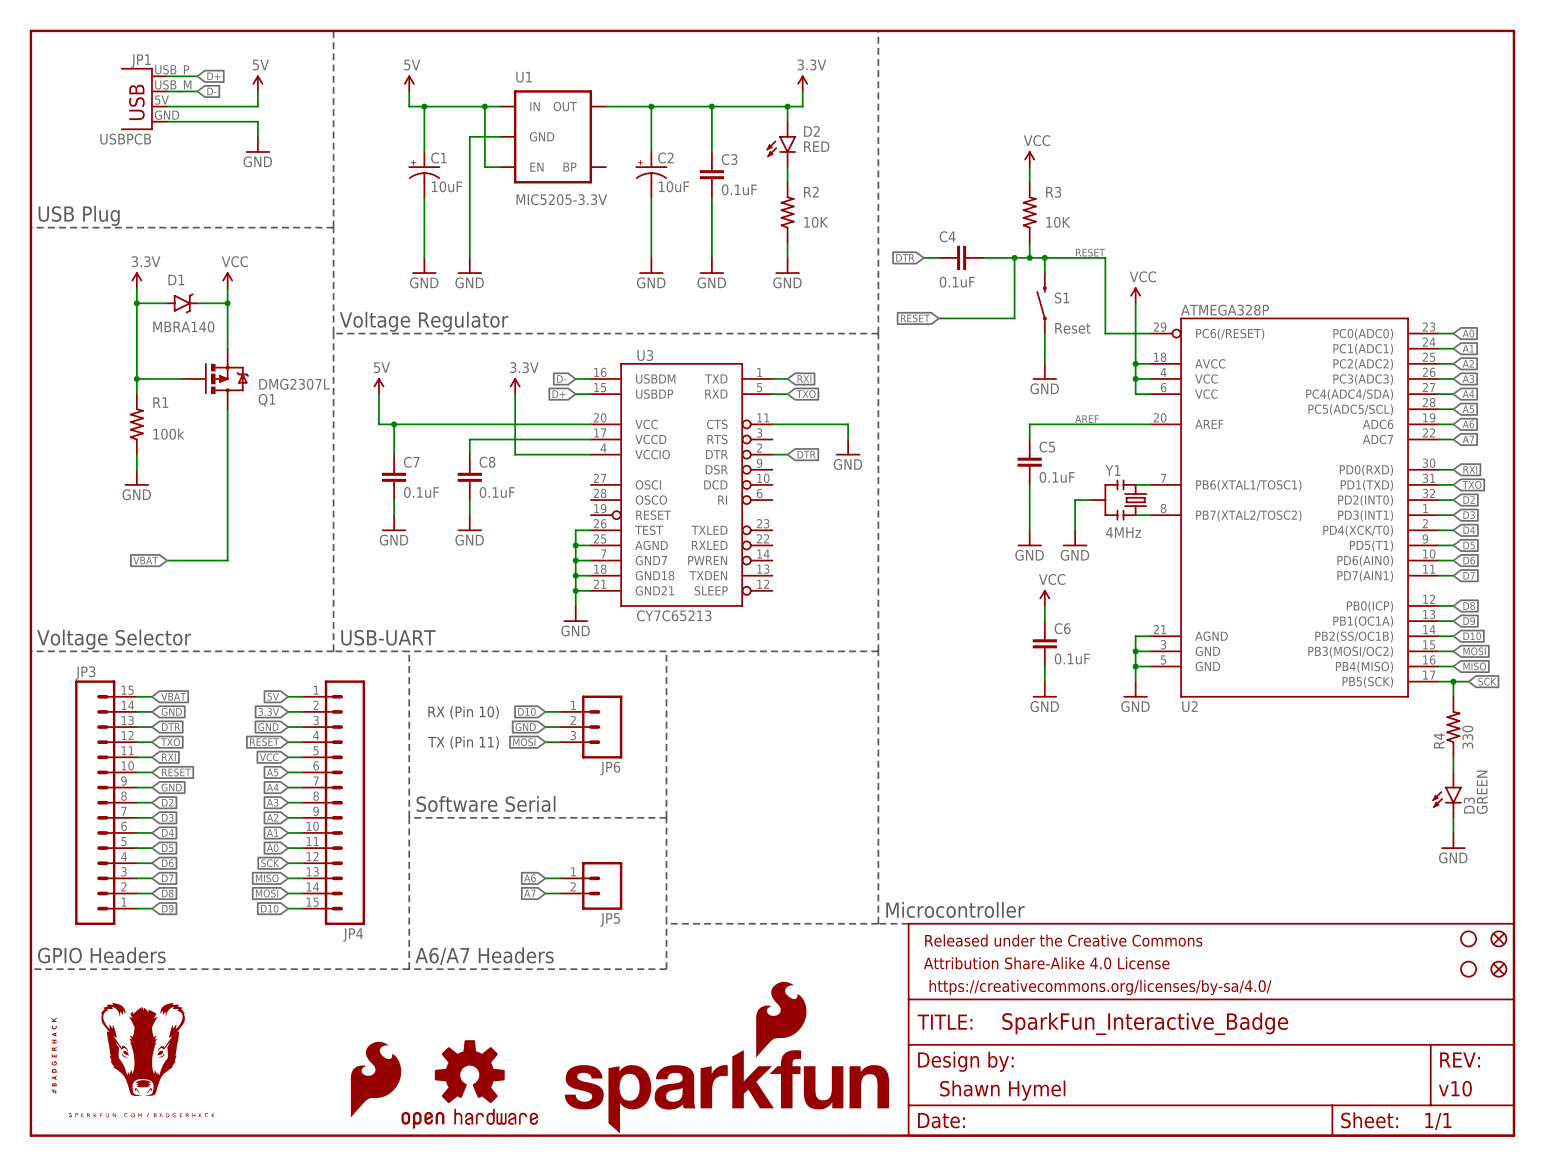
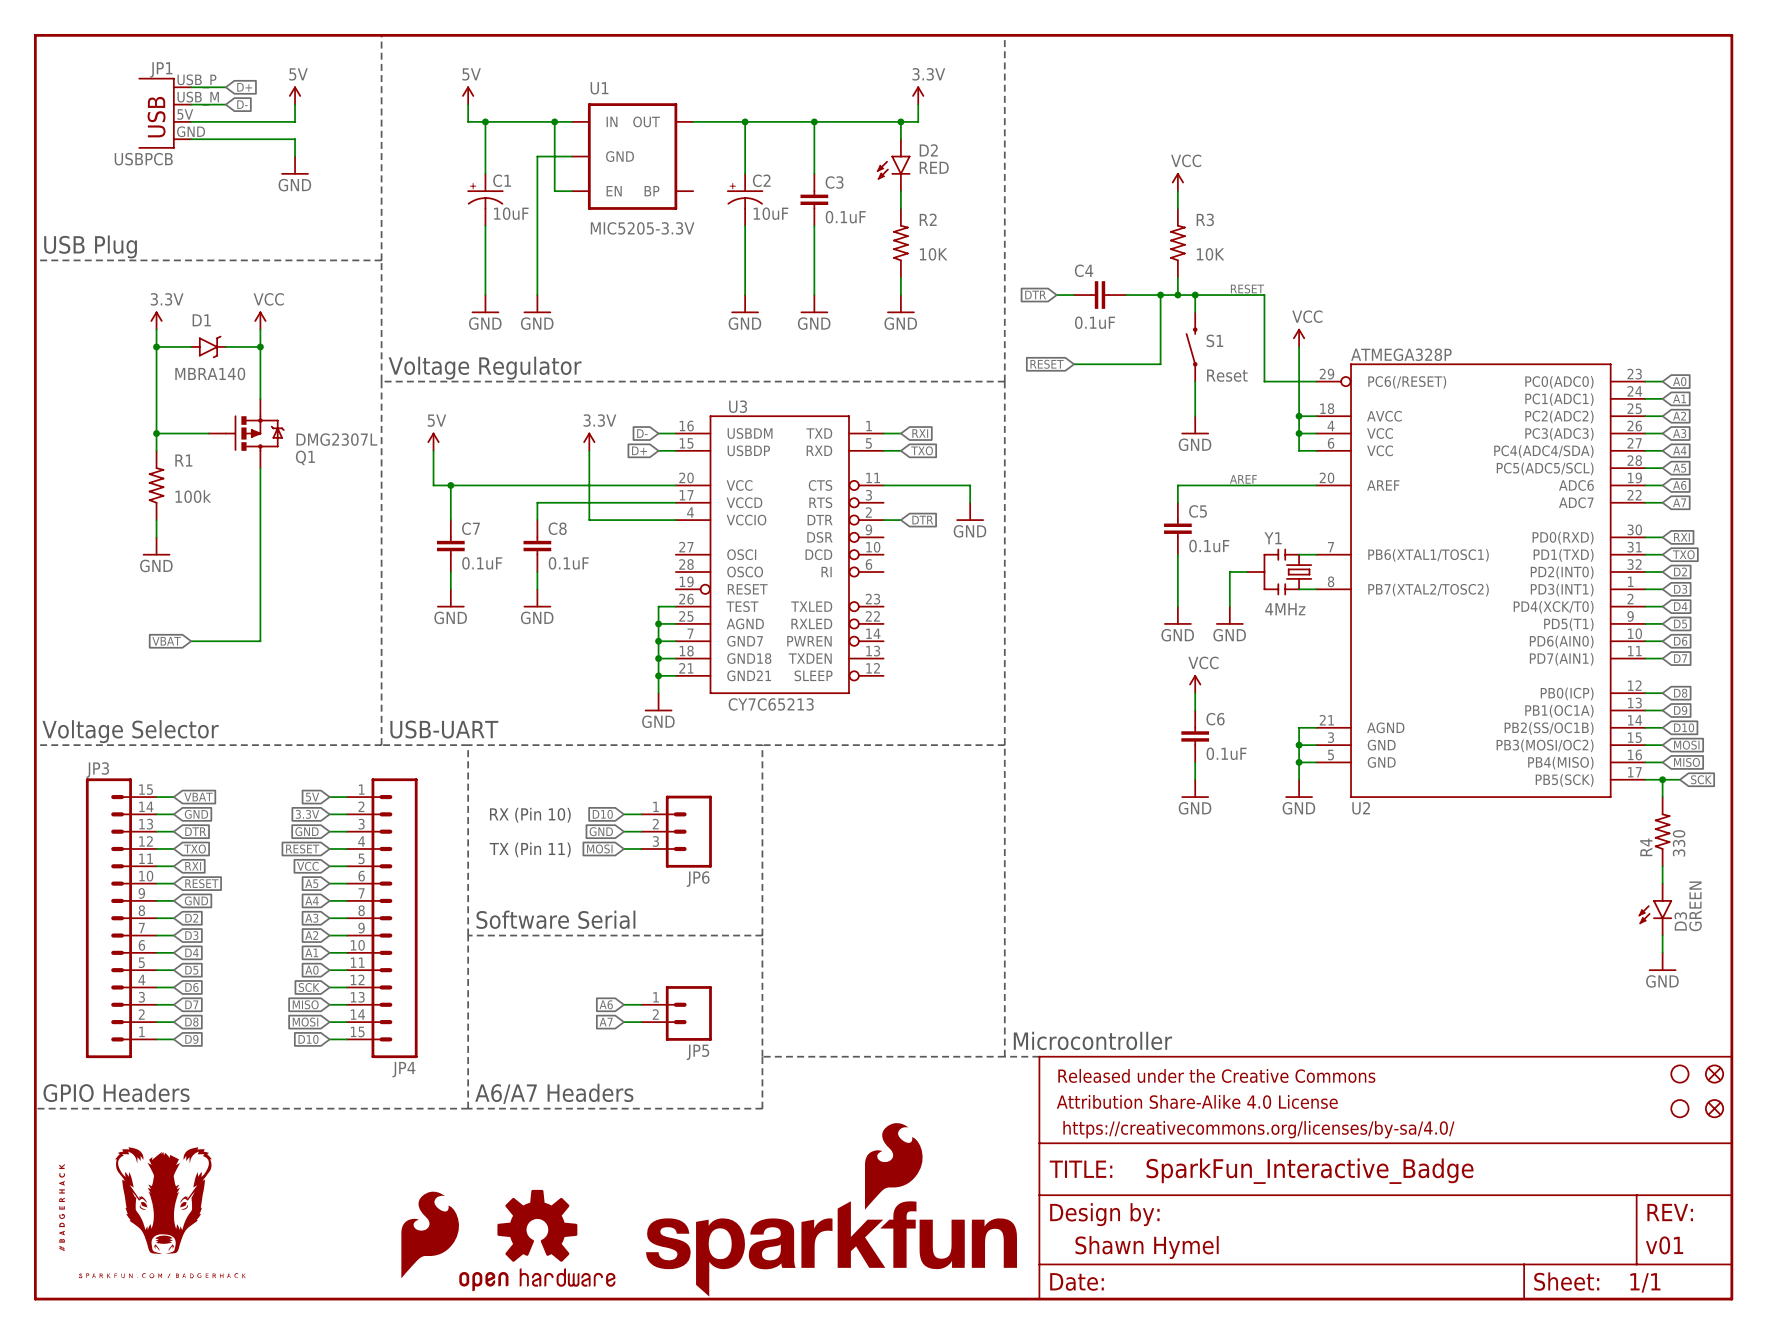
part text: v10 (1455, 1088) -> v01 (1664, 1245)

